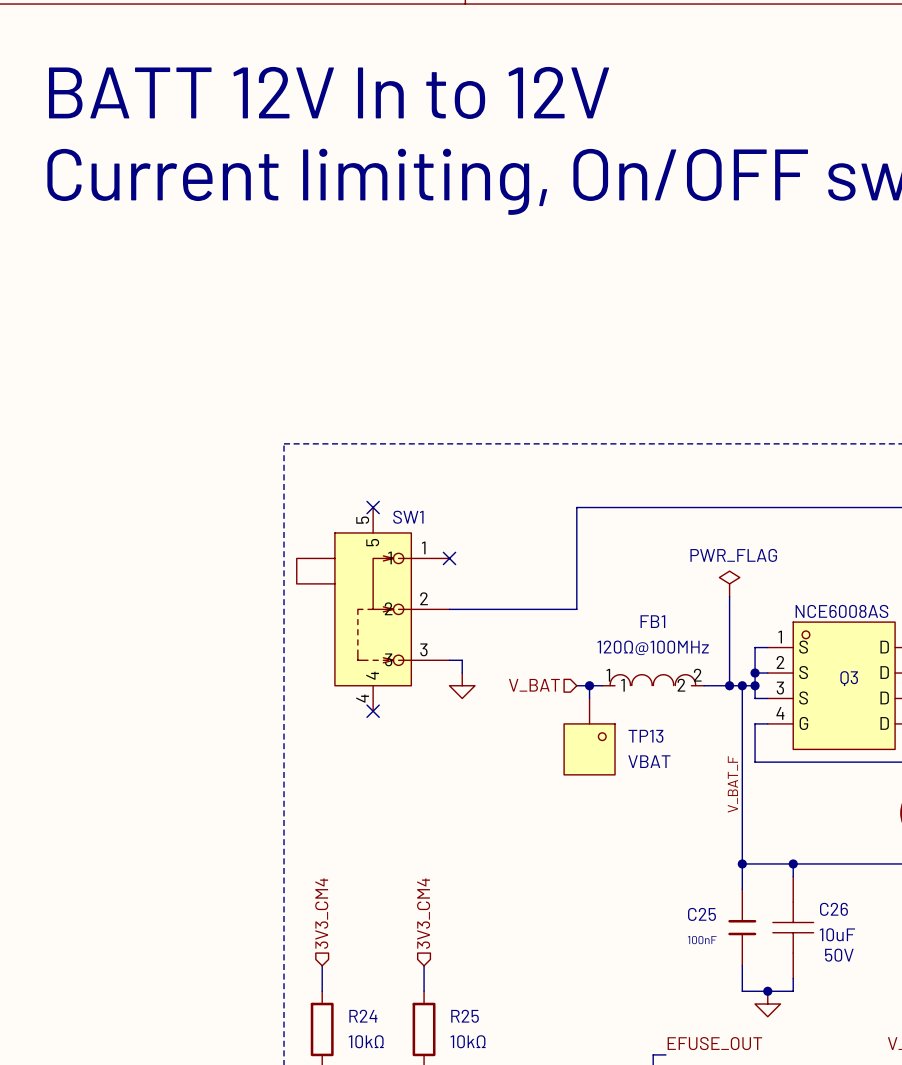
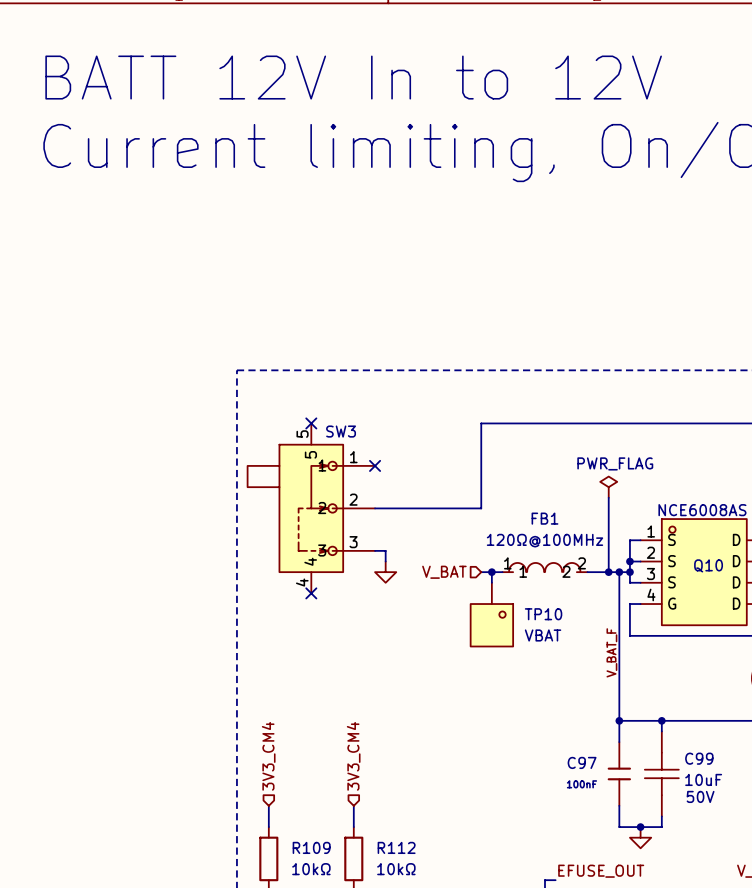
SW1 name: SW1 (408, 517) -> SW3 (341, 431)
Q3 name: Q3 (849, 678) -> Q10 (708, 565)
TP13 name: TP13 (645, 736) -> TP10 (543, 614)
C26 name: C26 (833, 909) -> C99 (699, 758)
C25 name: C25 (701, 914) -> C97 (582, 762)
R24 name: R24 (363, 1016) -> R109 (311, 847)
R25 name: R25 (465, 1016) -> R112 (396, 847)

